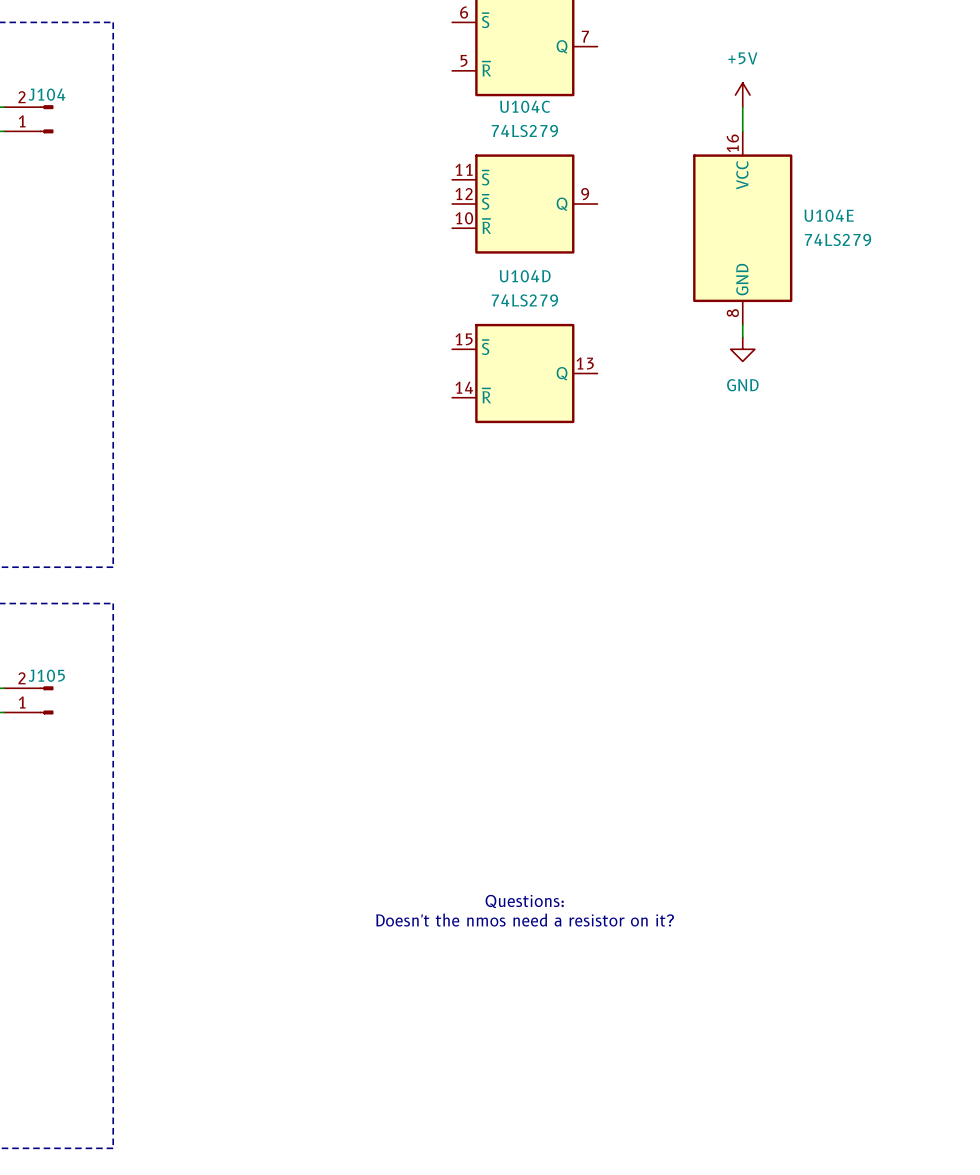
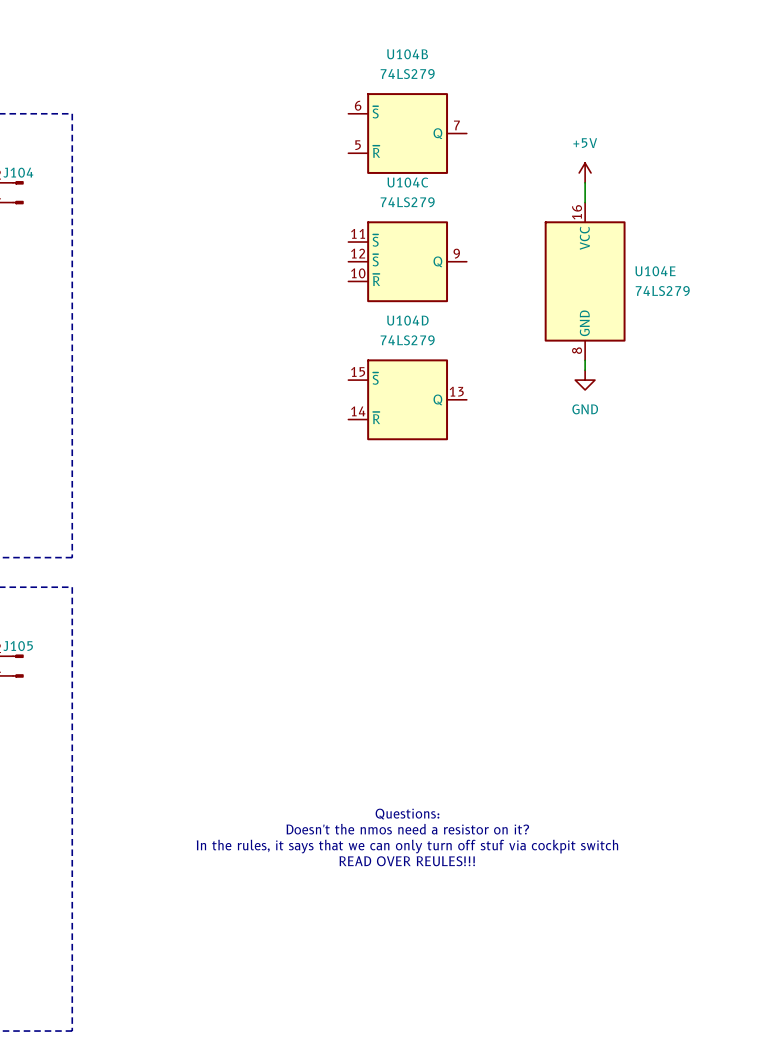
text: none -> Questions: (407, 814)
text: Questions: (524, 901) -> Doesn't the nmos need a resistor on it? (407, 829)
text: Doesn't the nmos need a resistor on it? (525, 920) -> In the rules, it says that we can only turn off stuf via cockpit switch (407, 846)
text: none -> READ OVER REULES!!! (407, 861)

